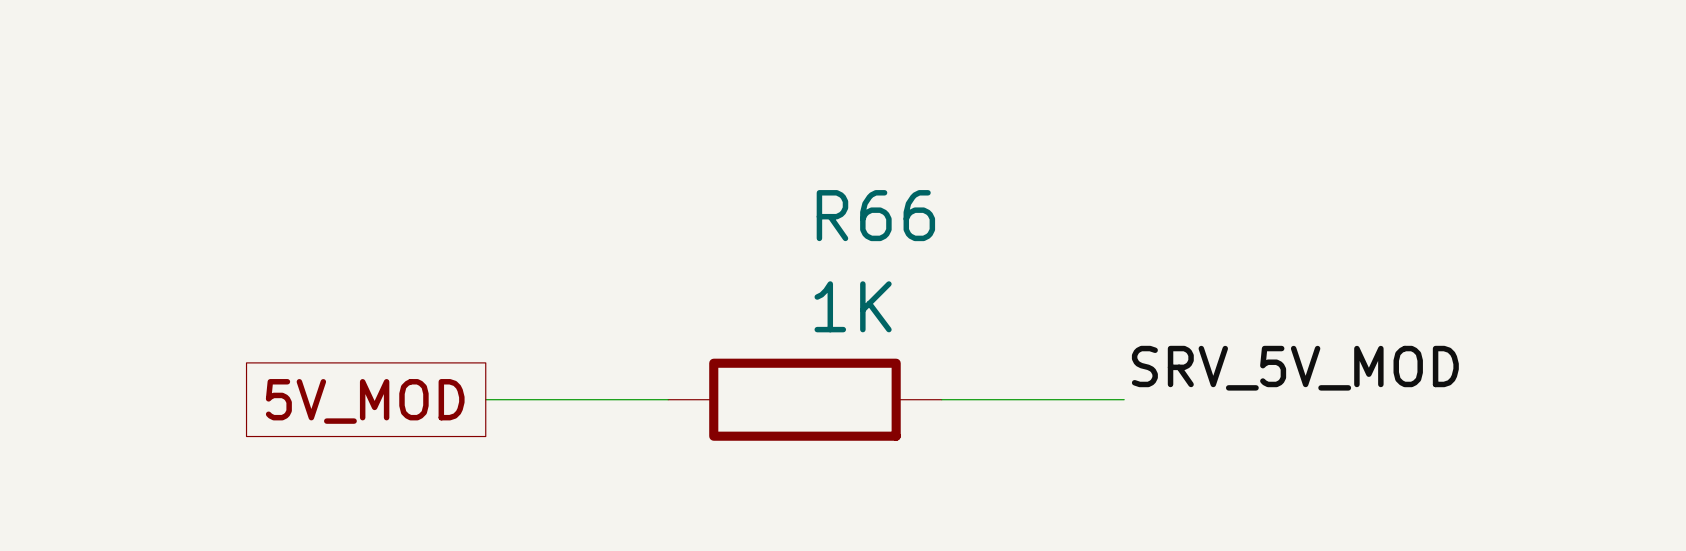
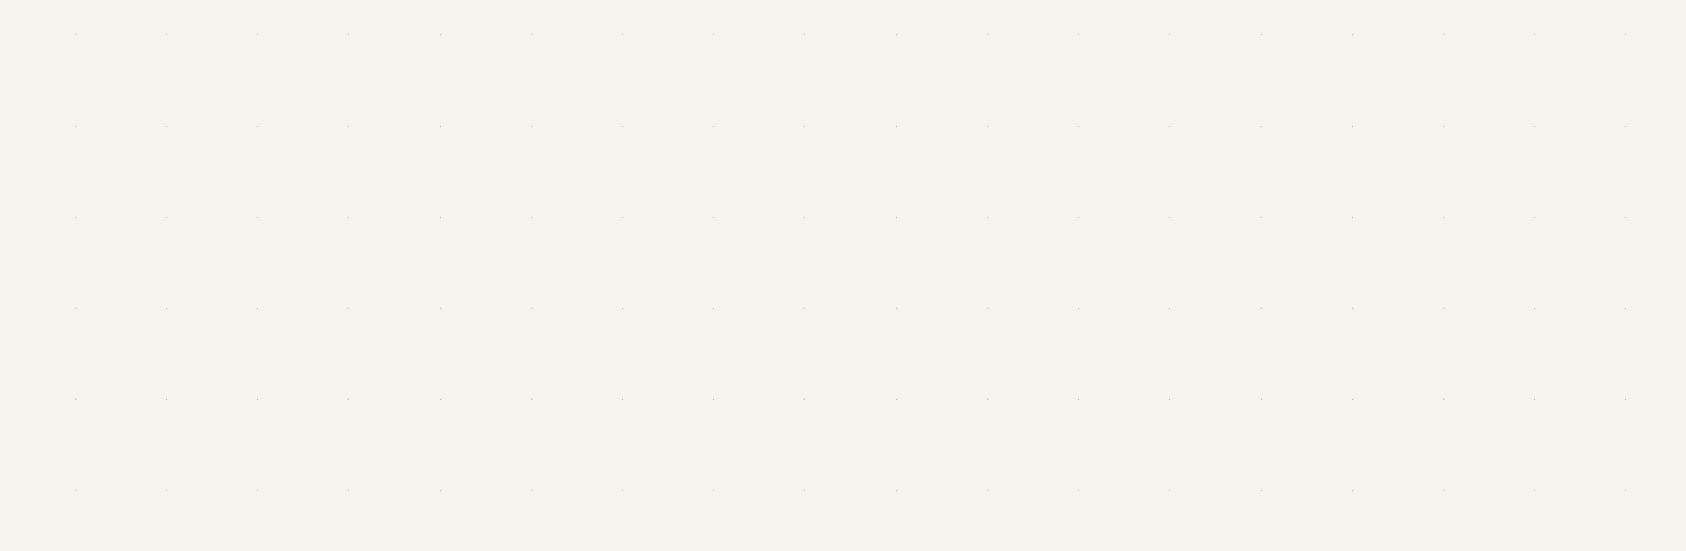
label: SRV_5V_MOD (1295, 368) -> none
wire: (485, 399) (668, 399) -> none
R66: 1K (804, 399) -> none
wire: (941, 399) (1124, 399) -> none
global label: 5V_MOD (365, 401) -> none

